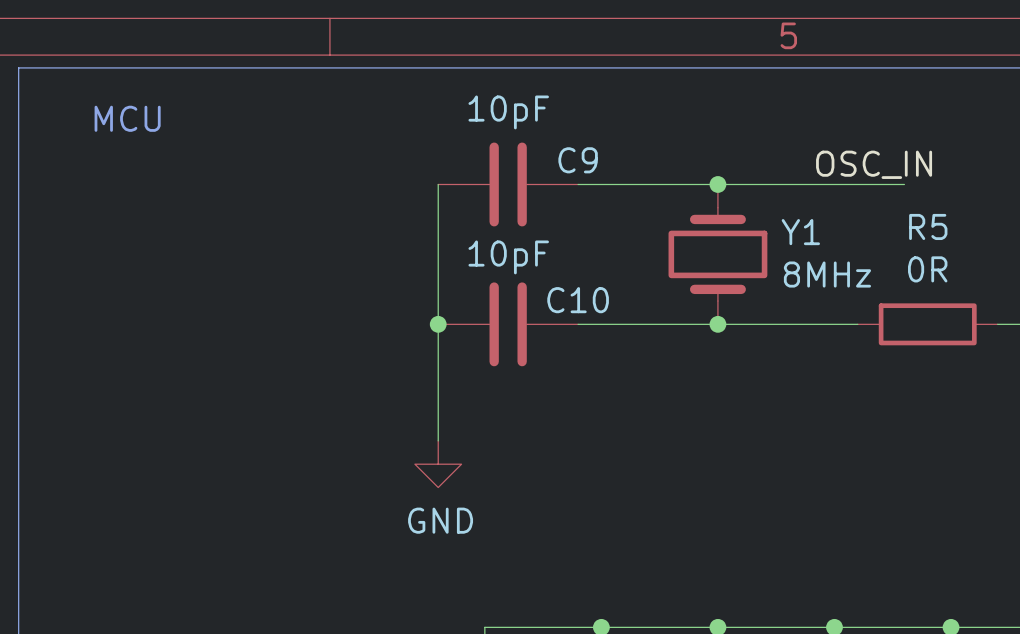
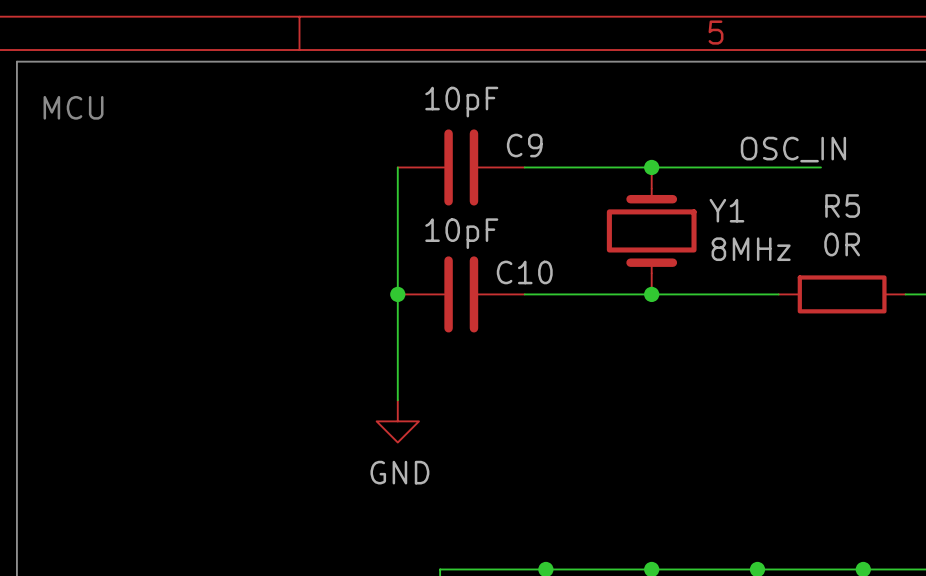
text position: MCU (127, 118) -> MCU (73, 107)

